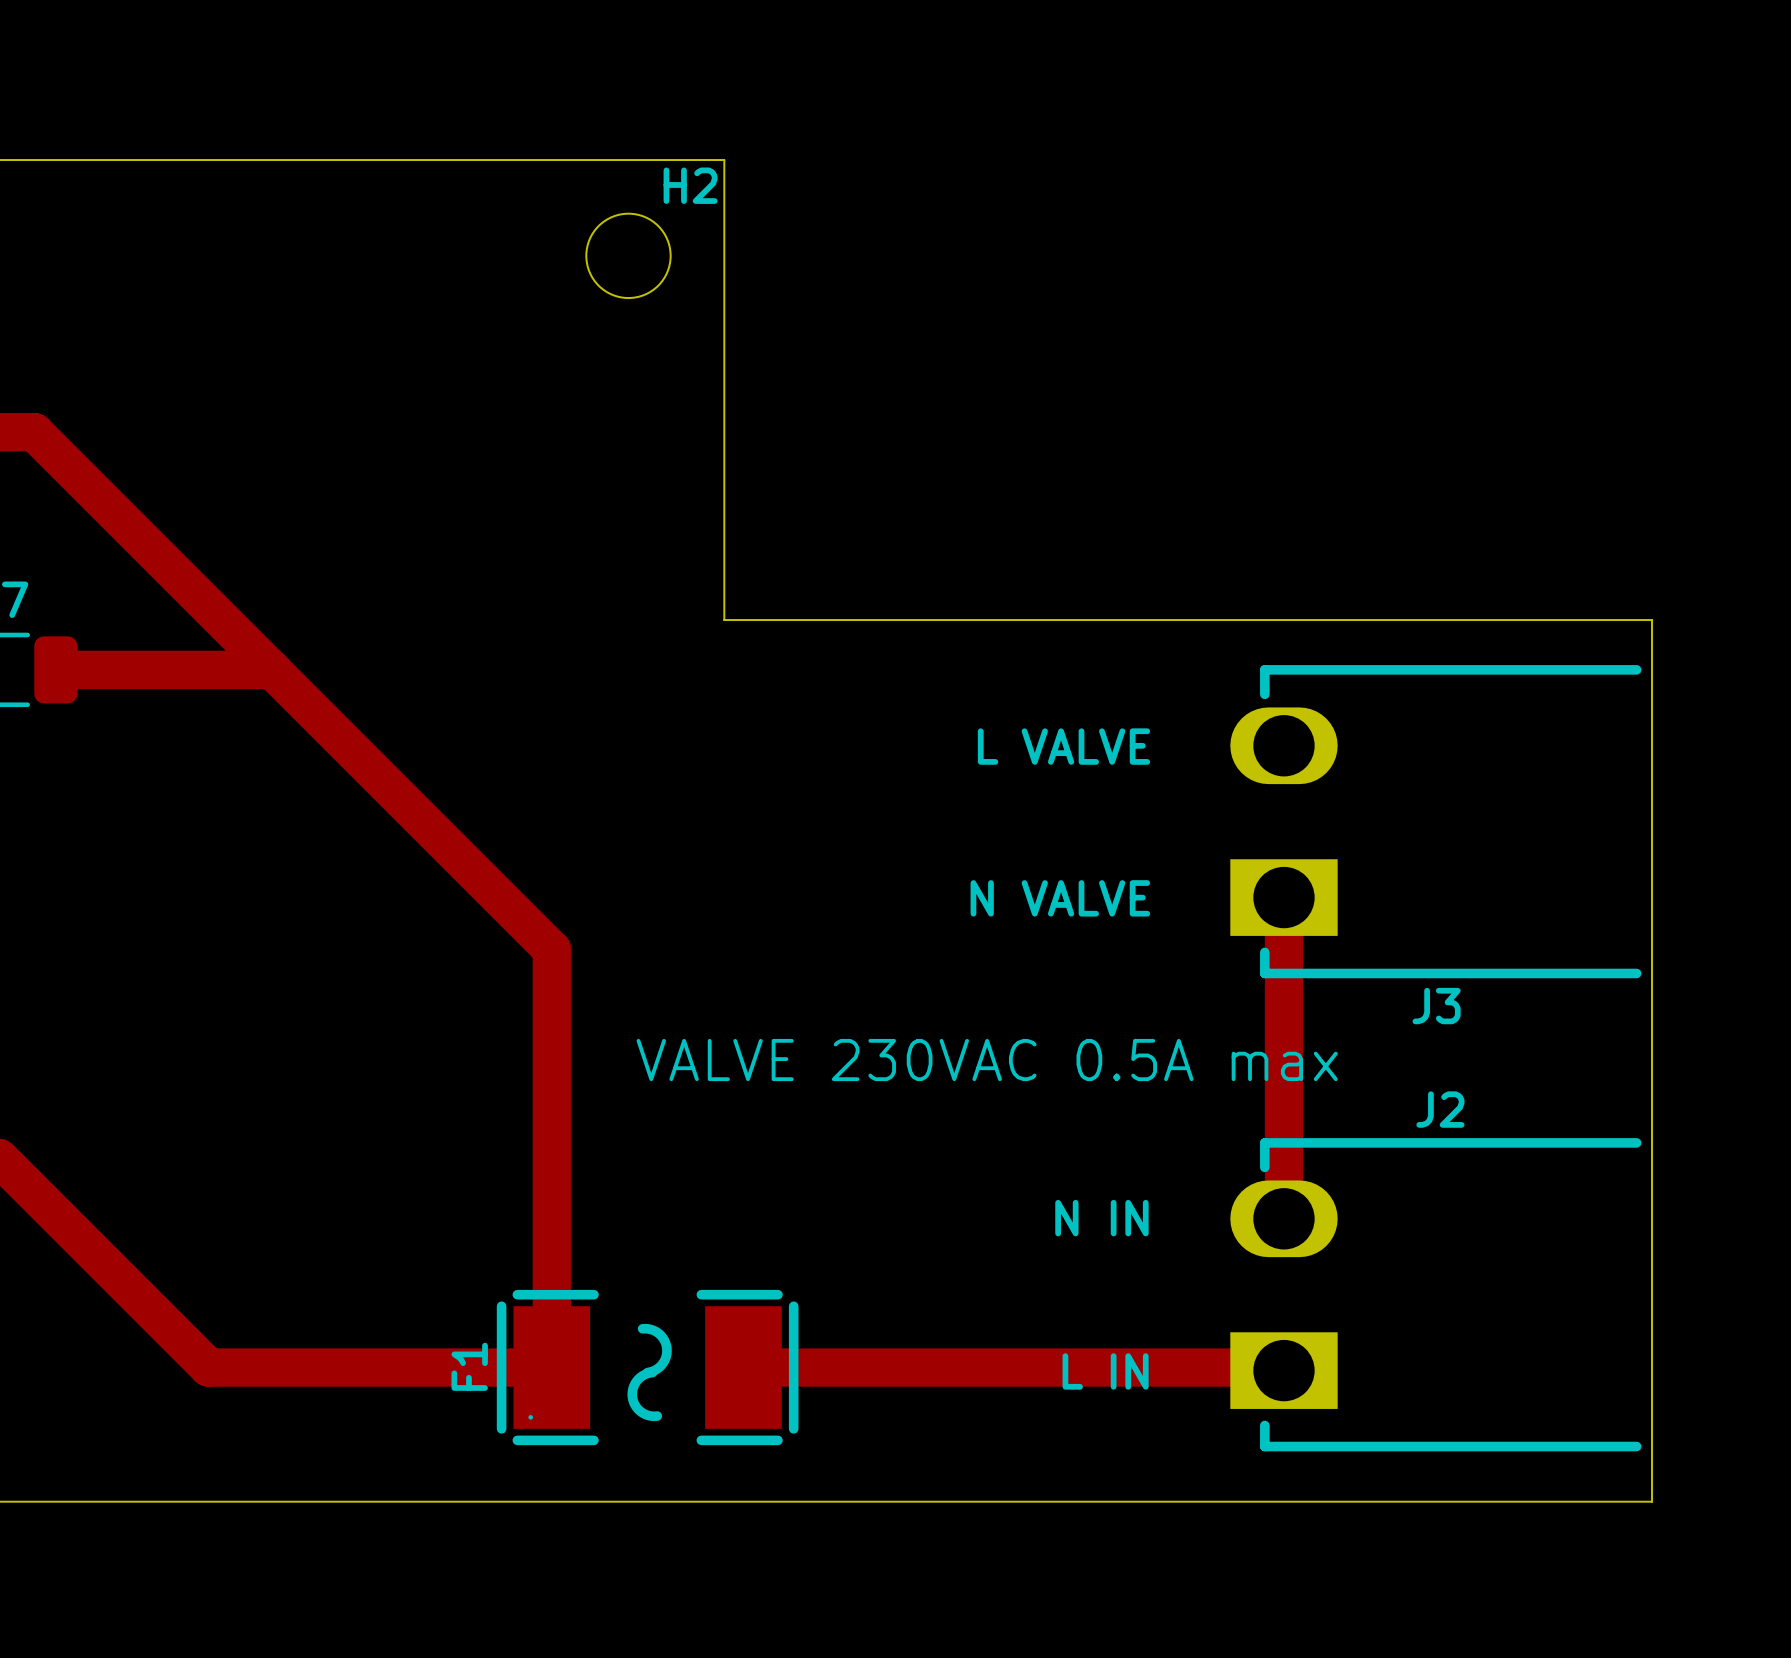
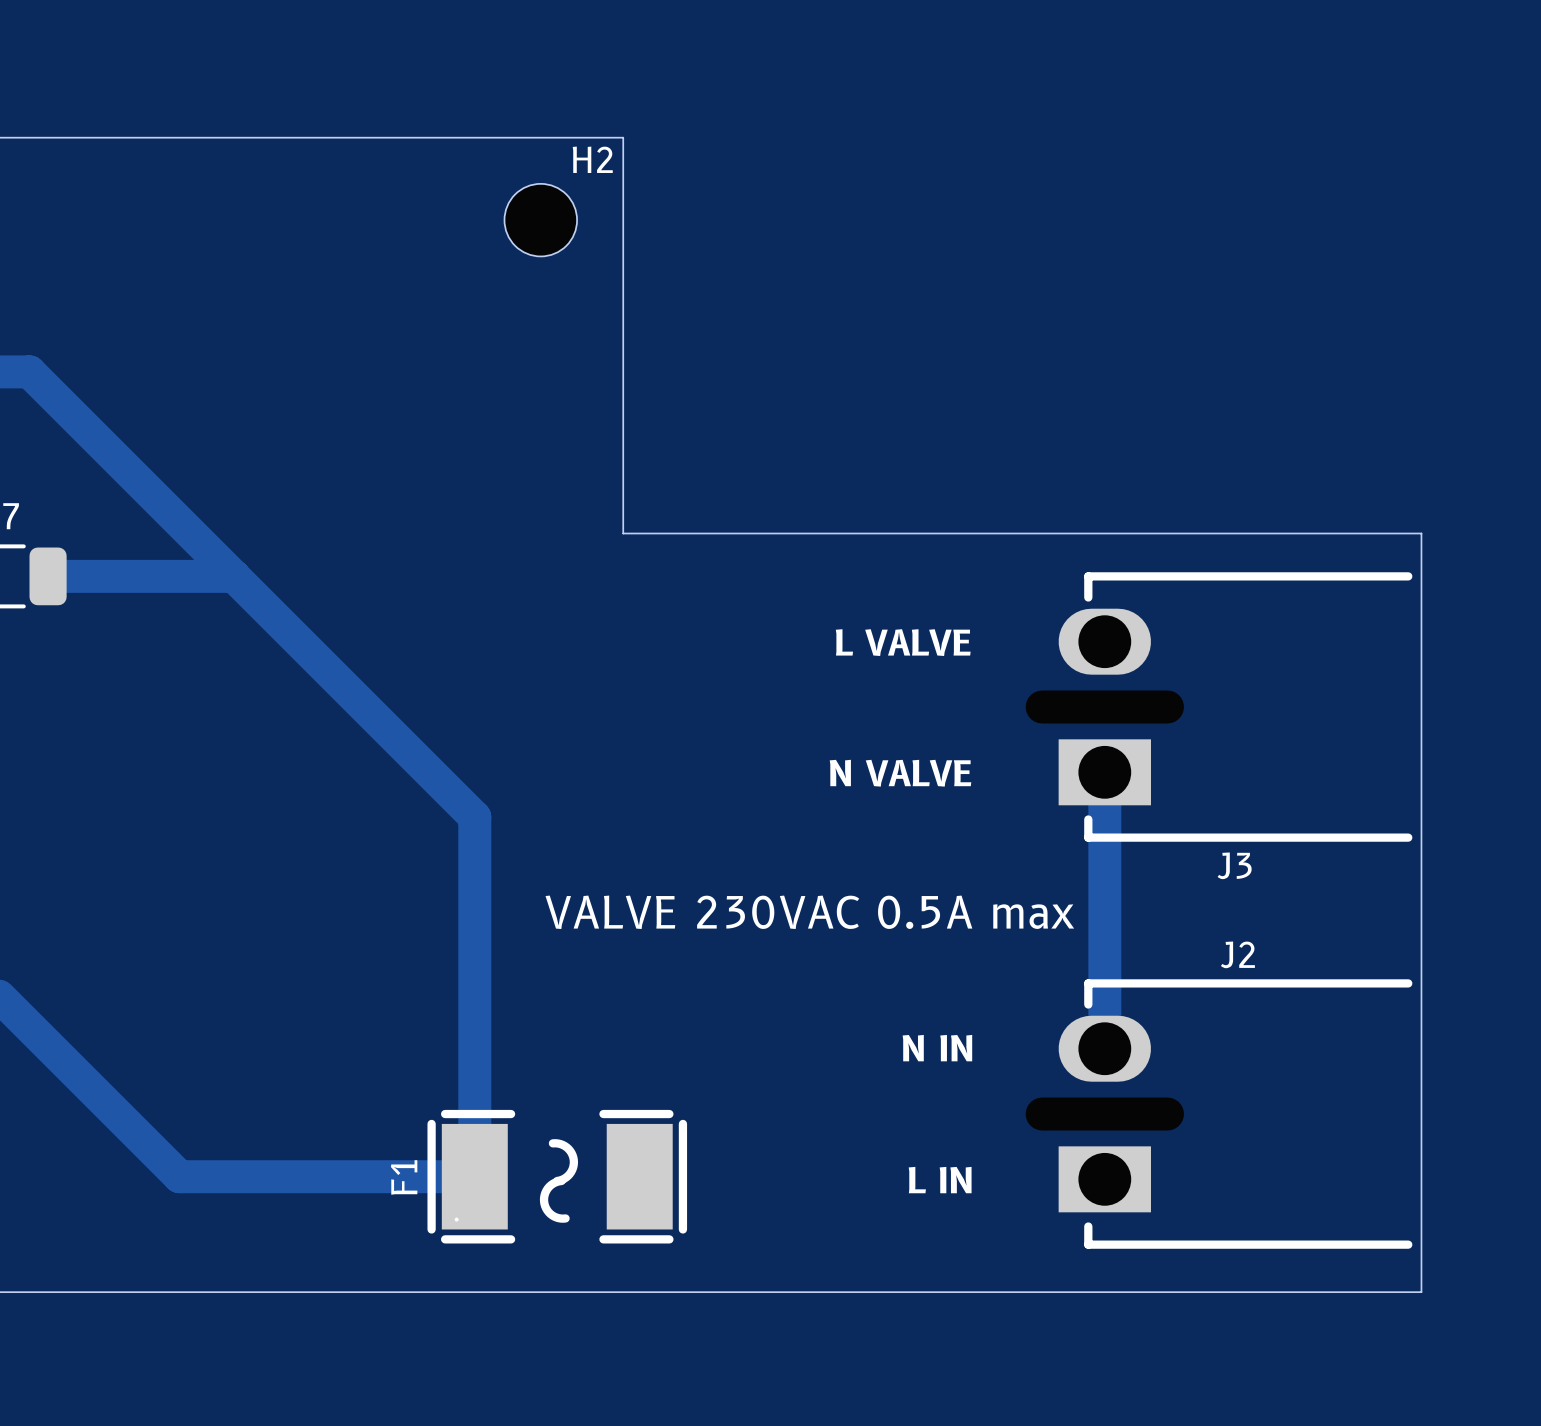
track: (743, 1367) (1280, 1367) (1283, 1370) -> none

